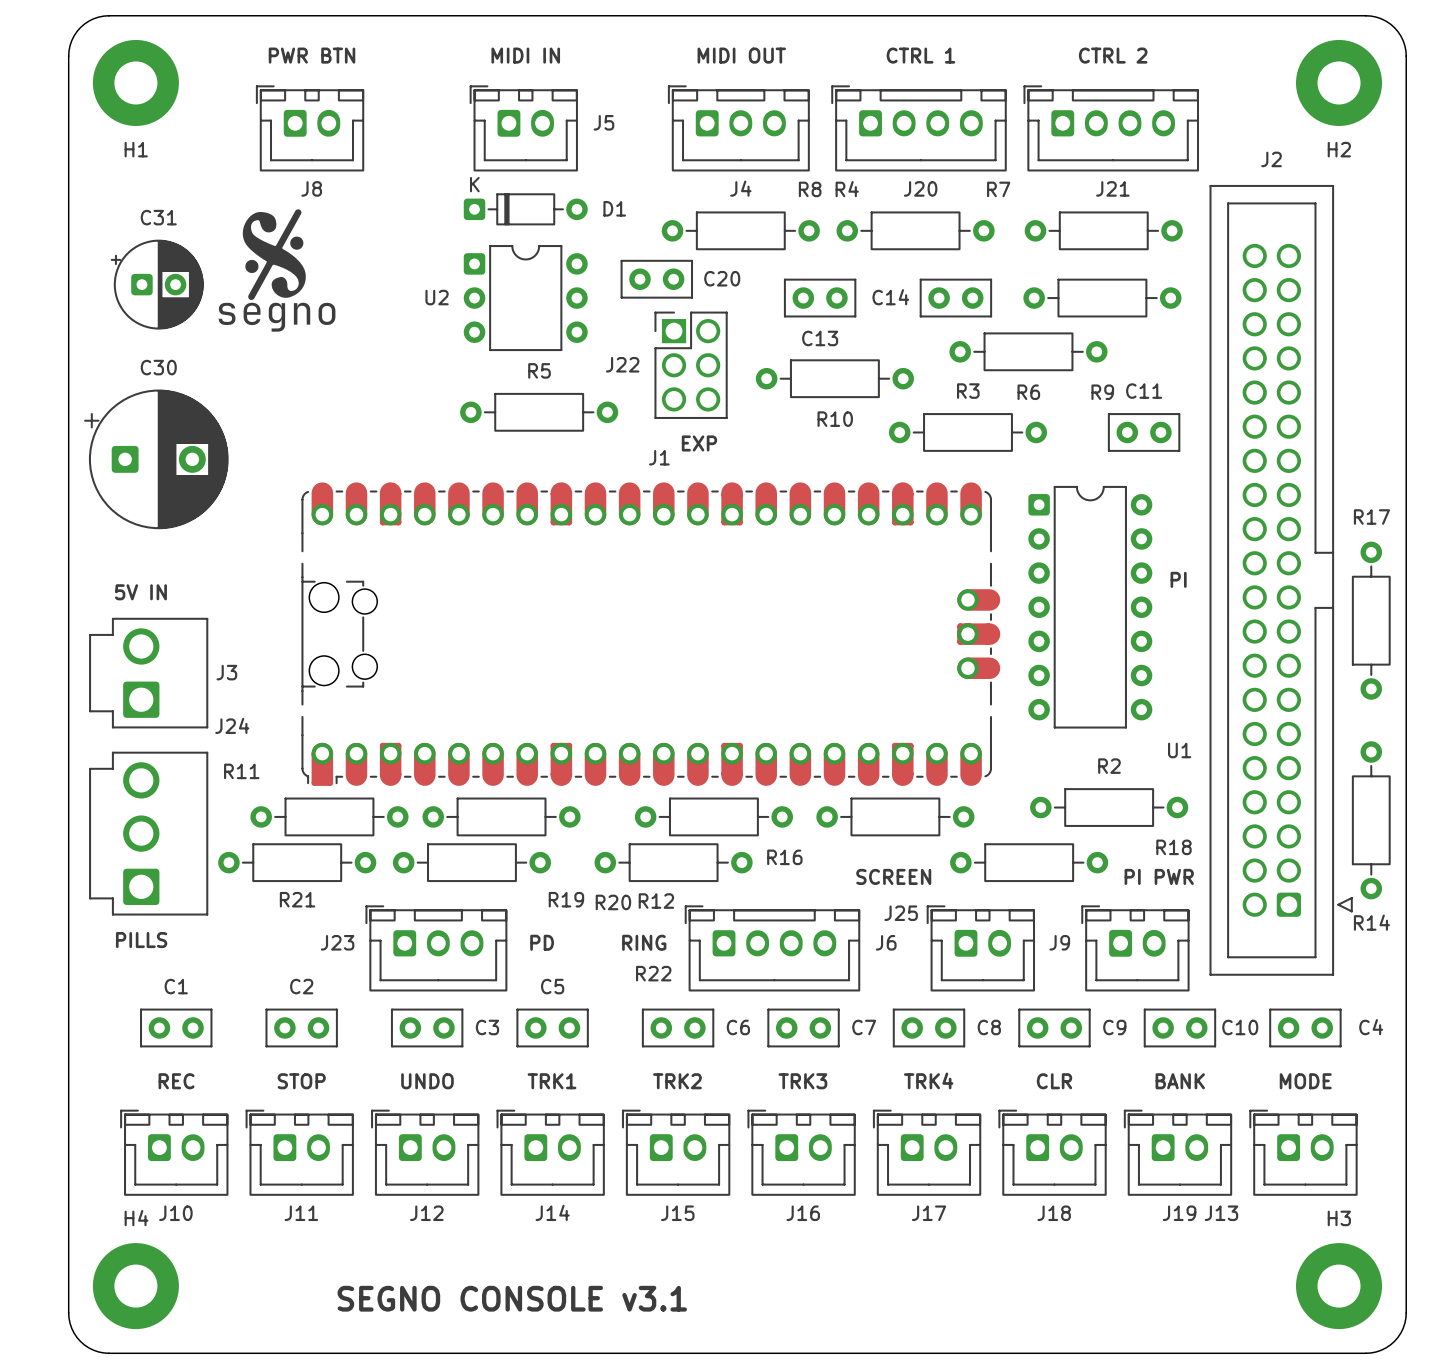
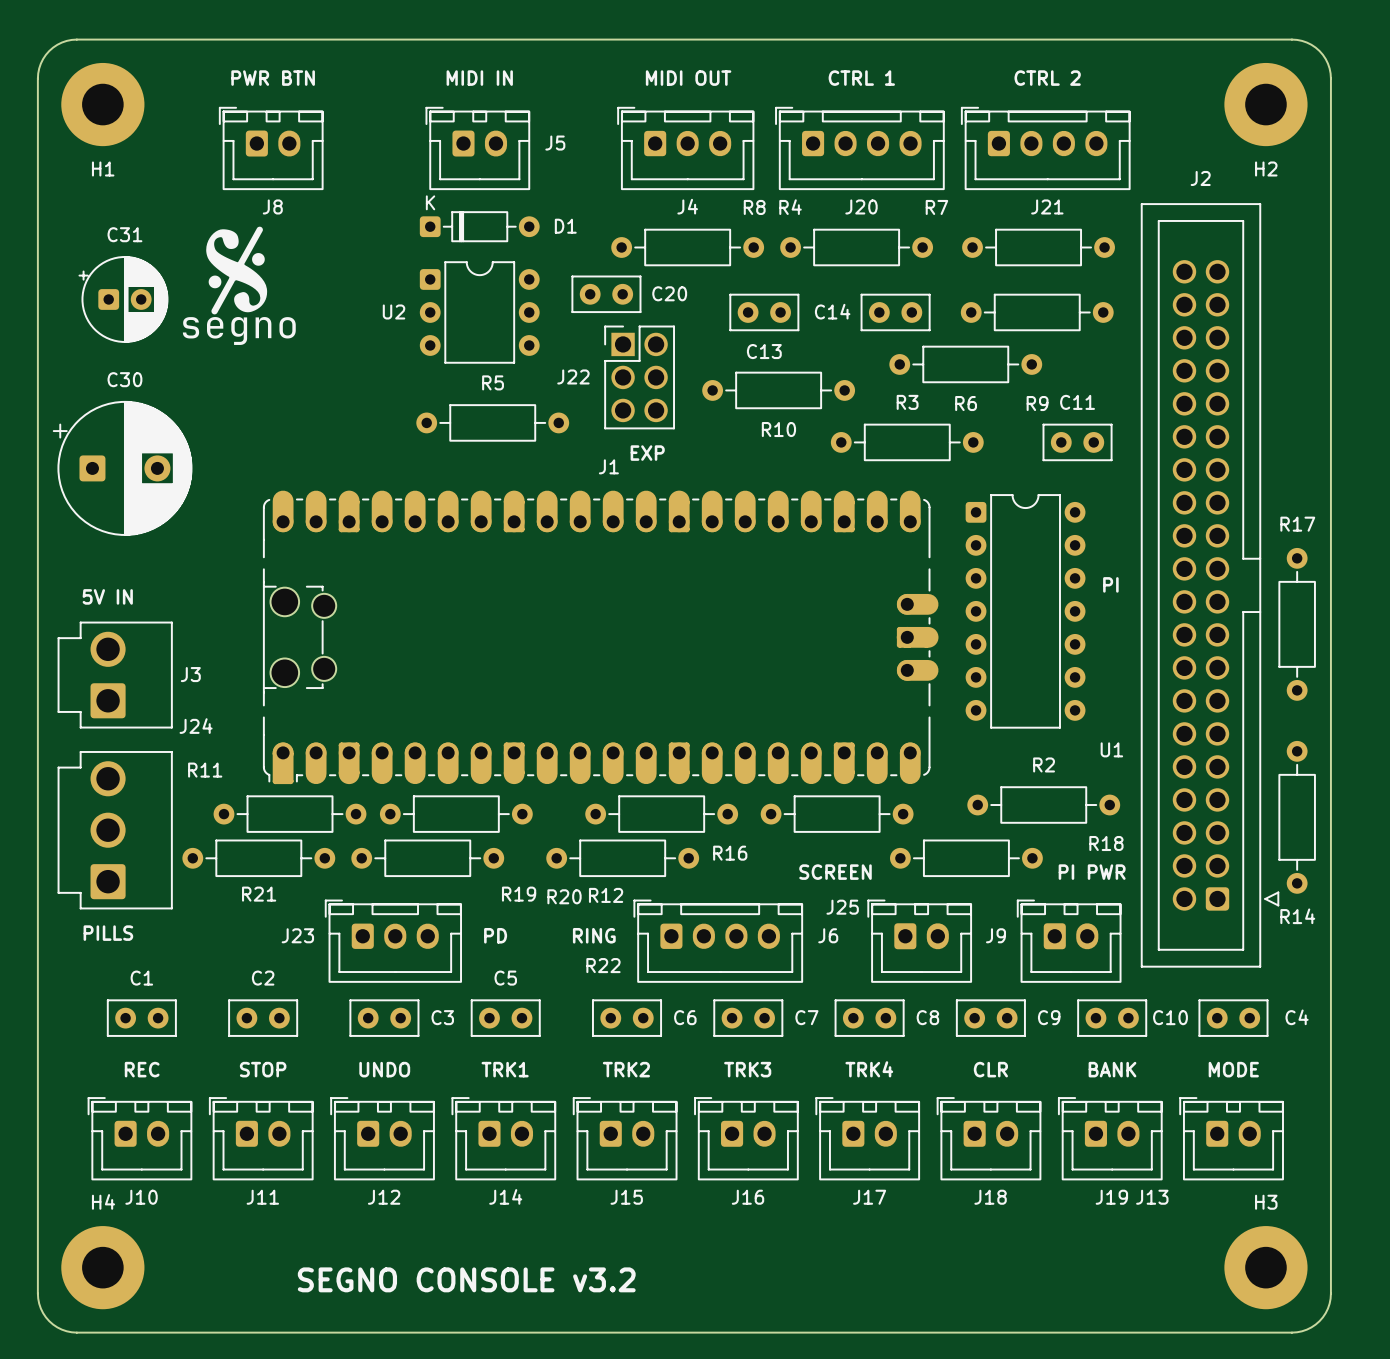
text: SEGNO CONSOLE v3.1 (512, 1298) -> SEGNO CONSOLE v3.2 (466, 1279)

